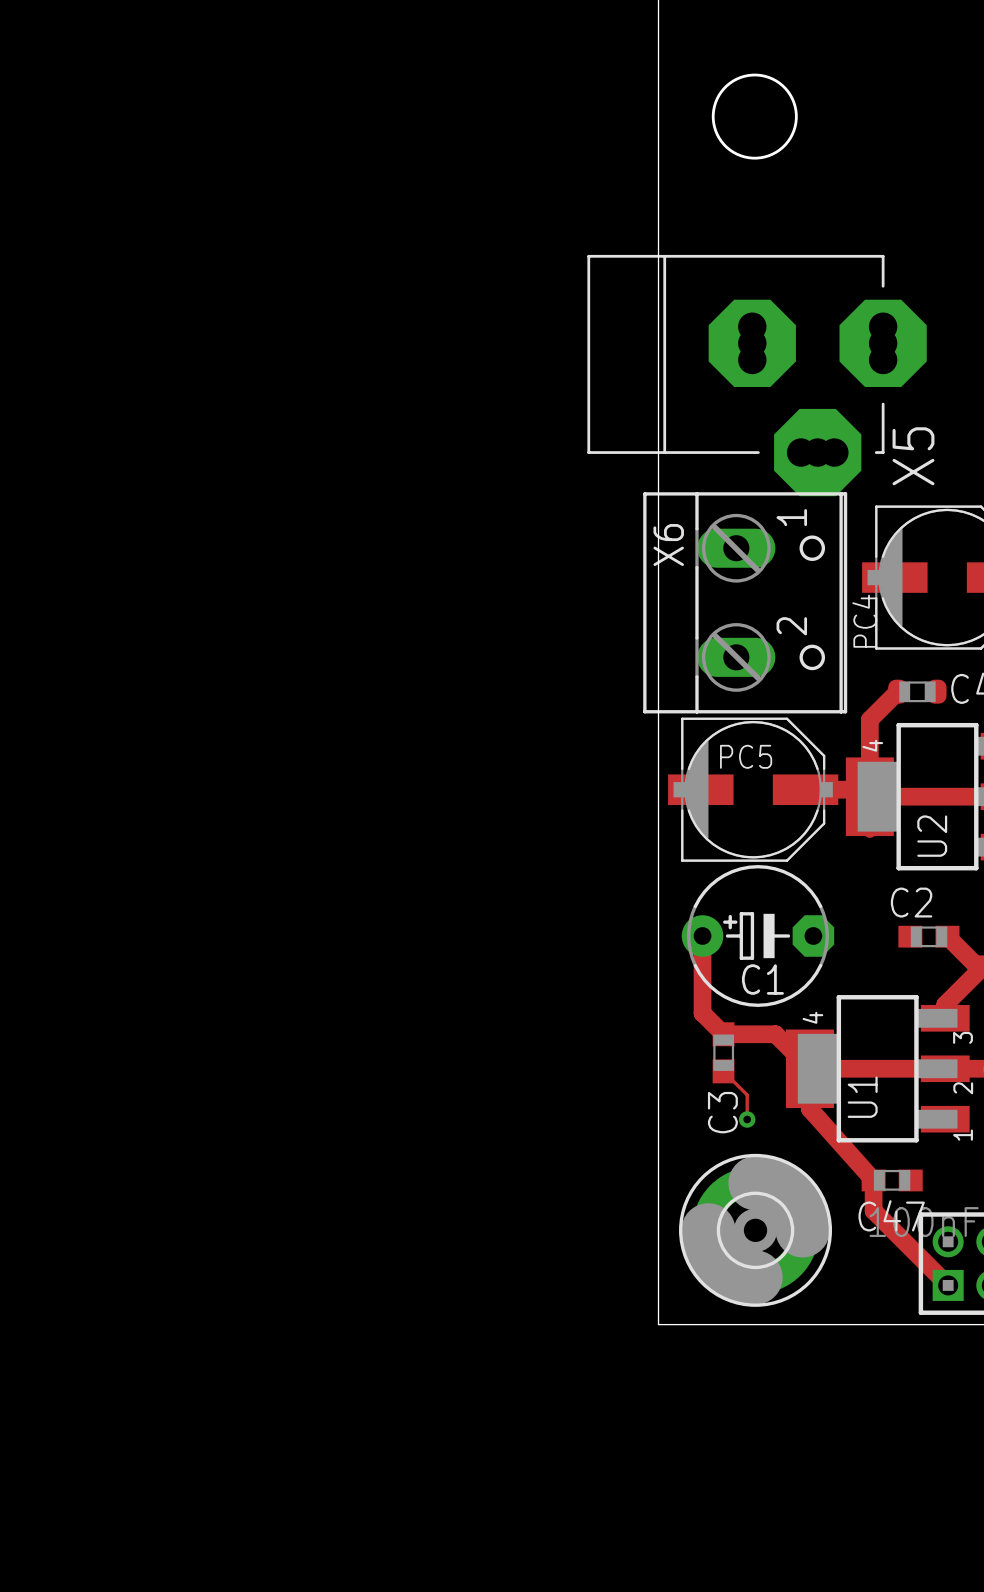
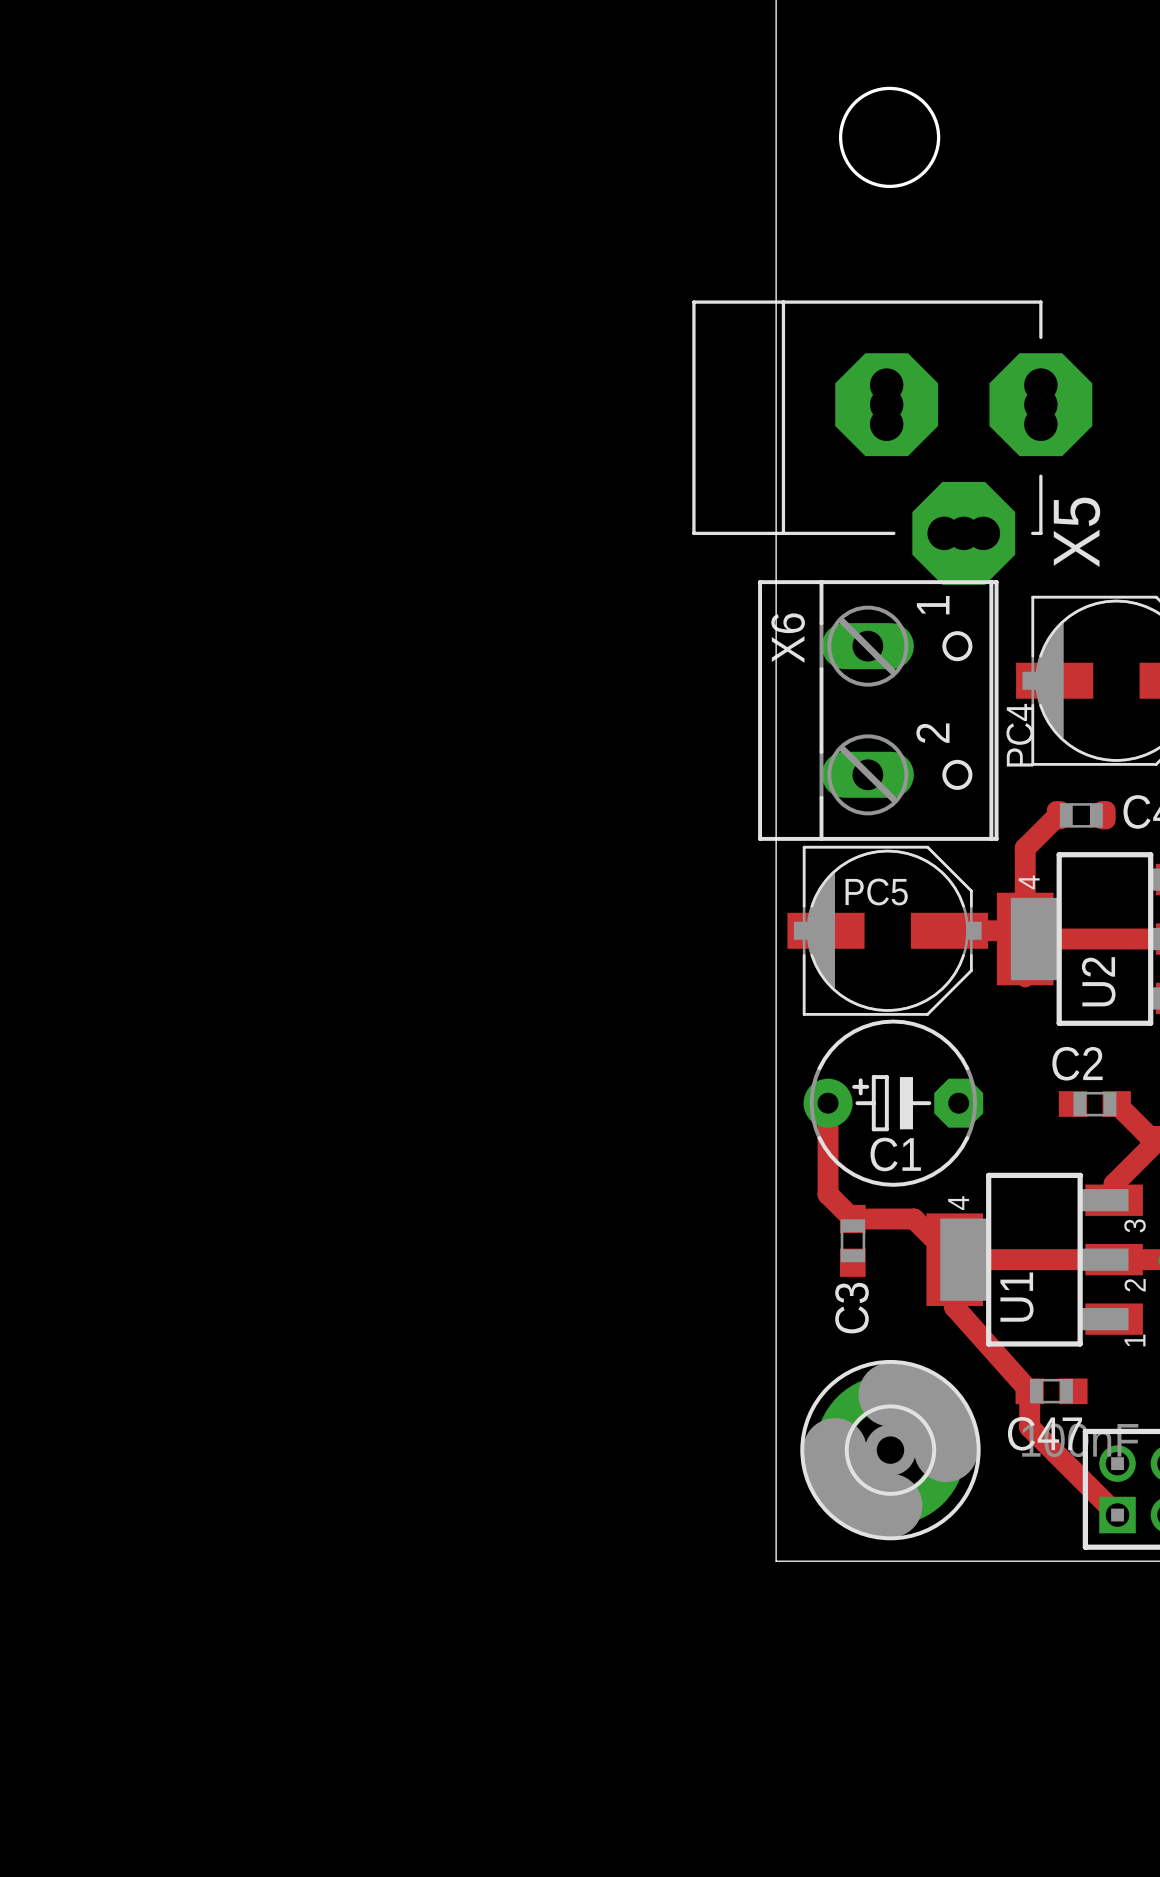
top track: (723, 1071) (747, 1095) (747, 1119) -> none
via: (747, 1119) -> none

